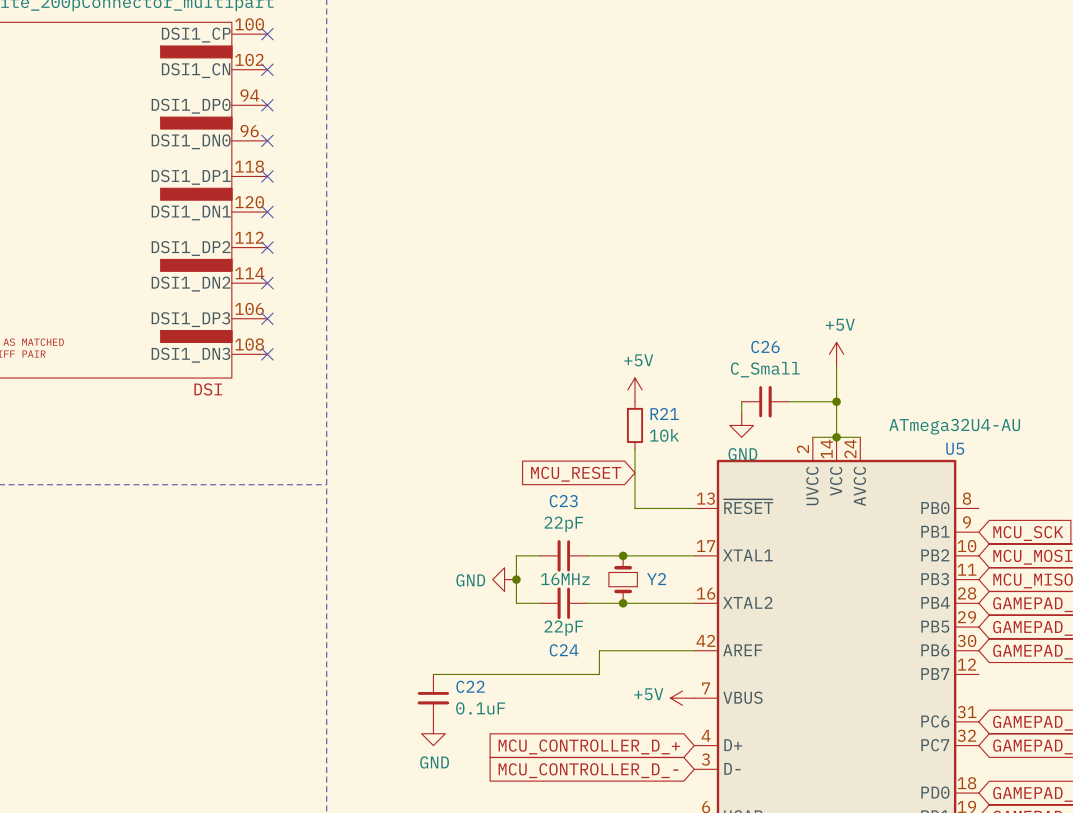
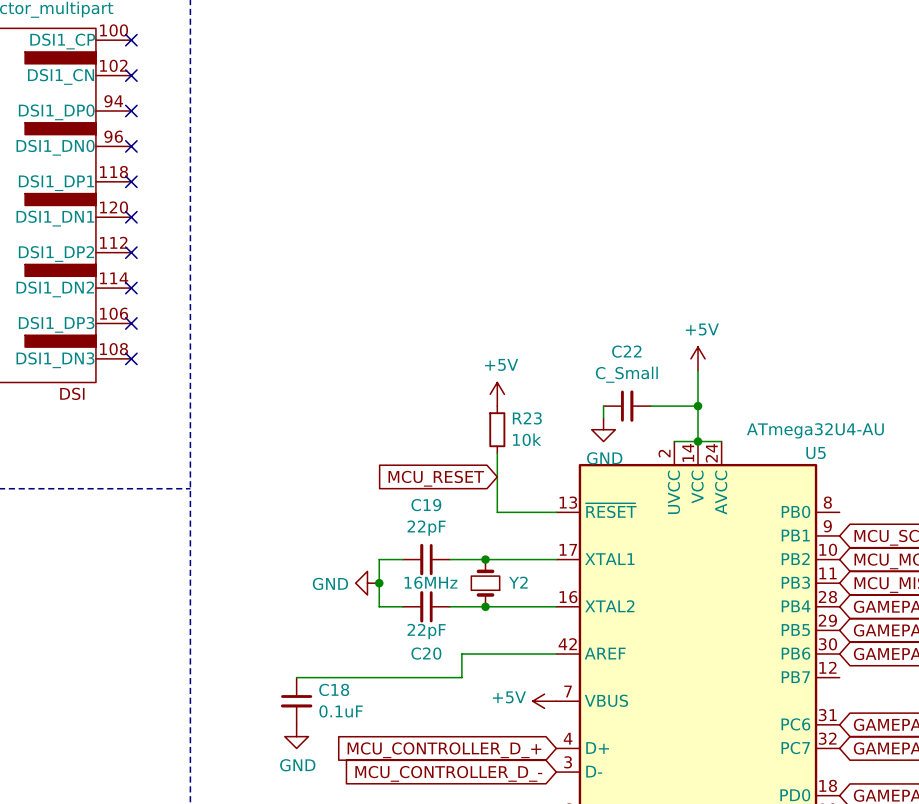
C26 name: C26 (765, 346) -> C22 (626, 351)
R21 name: R21 (664, 414) -> R23 (527, 418)
C23 name: C23 (563, 501) -> C19 (426, 505)
C24 name: C24 (564, 650) -> C20 (426, 653)
C22 name: C22 (470, 686) -> C18 (334, 689)

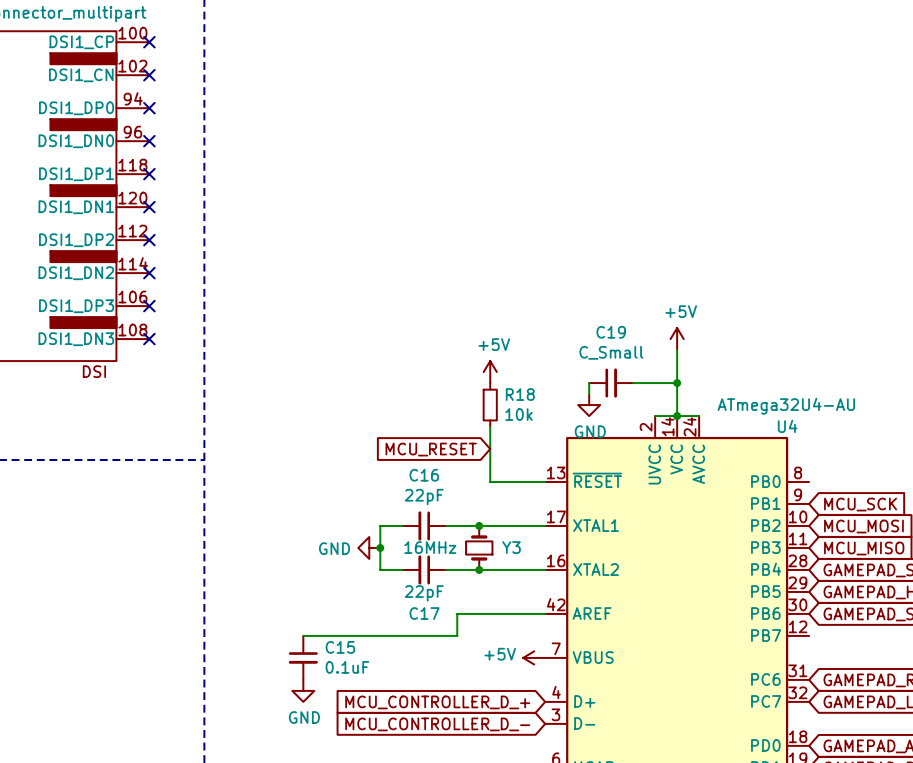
C22 name: C22 (626, 351) -> C19 (611, 332)
R23 name: R23 (527, 418) -> R18 (520, 394)
U5 name: U5 (816, 453) -> U4 (787, 426)
C19 name: C19 (426, 505) -> C16 (424, 475)
Y2 name: Y2 (518, 582) -> Y3 (511, 547)
C20 name: C20 (426, 653) -> C17 (424, 613)
C18 name: C18 (334, 689) -> C15 (340, 647)

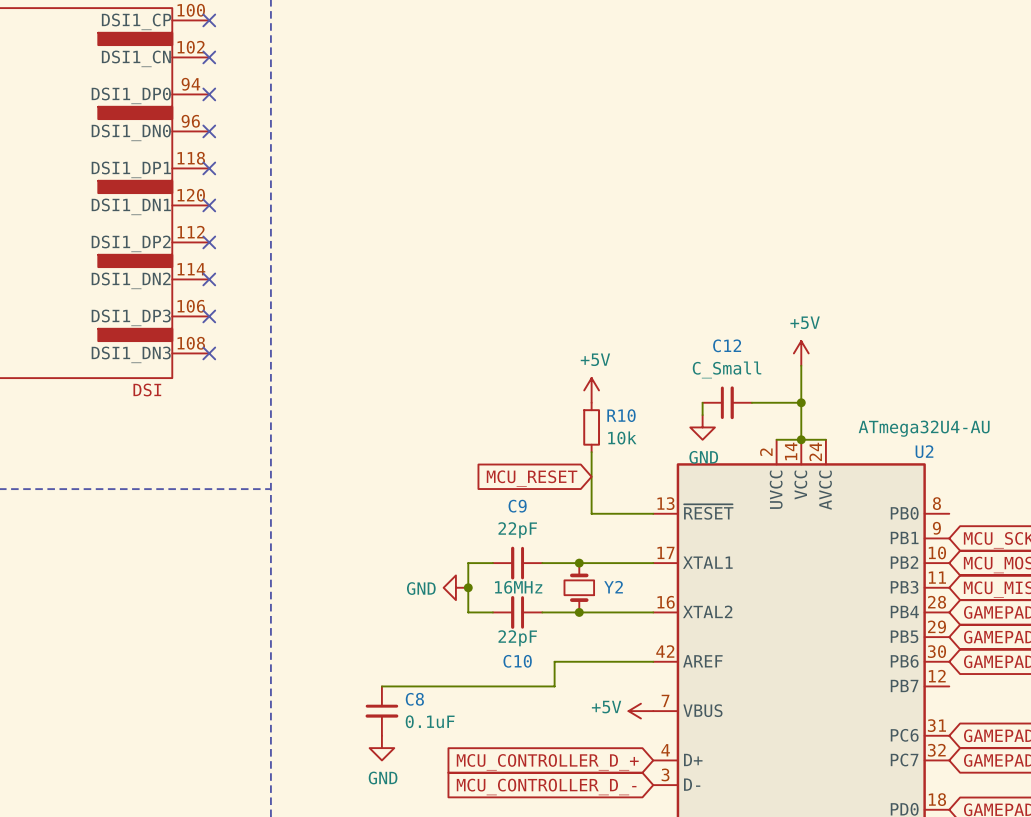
C19 name: C19 (611, 332) -> C12 (727, 345)
R18 name: R18 (520, 394) -> R10 (621, 415)
U4 name: U4 (787, 426) -> U2 (924, 451)
C16 name: C16 (424, 475) -> C9 (517, 506)
Y3 name: Y3 (511, 547) -> Y2 (613, 587)
C17 name: C17 (424, 613) -> C10 (517, 661)
C15 name: C15 (340, 647) -> C8 (414, 699)

